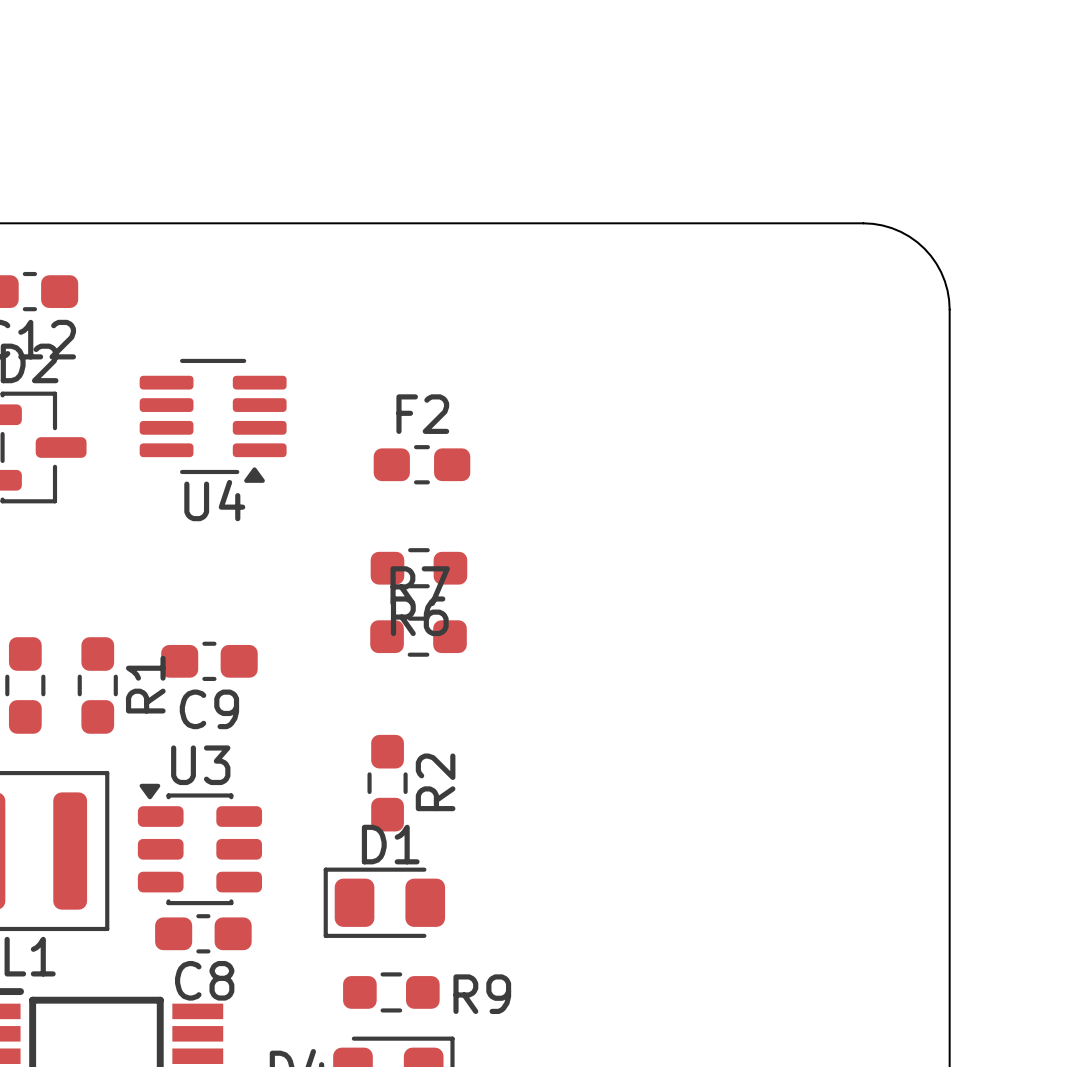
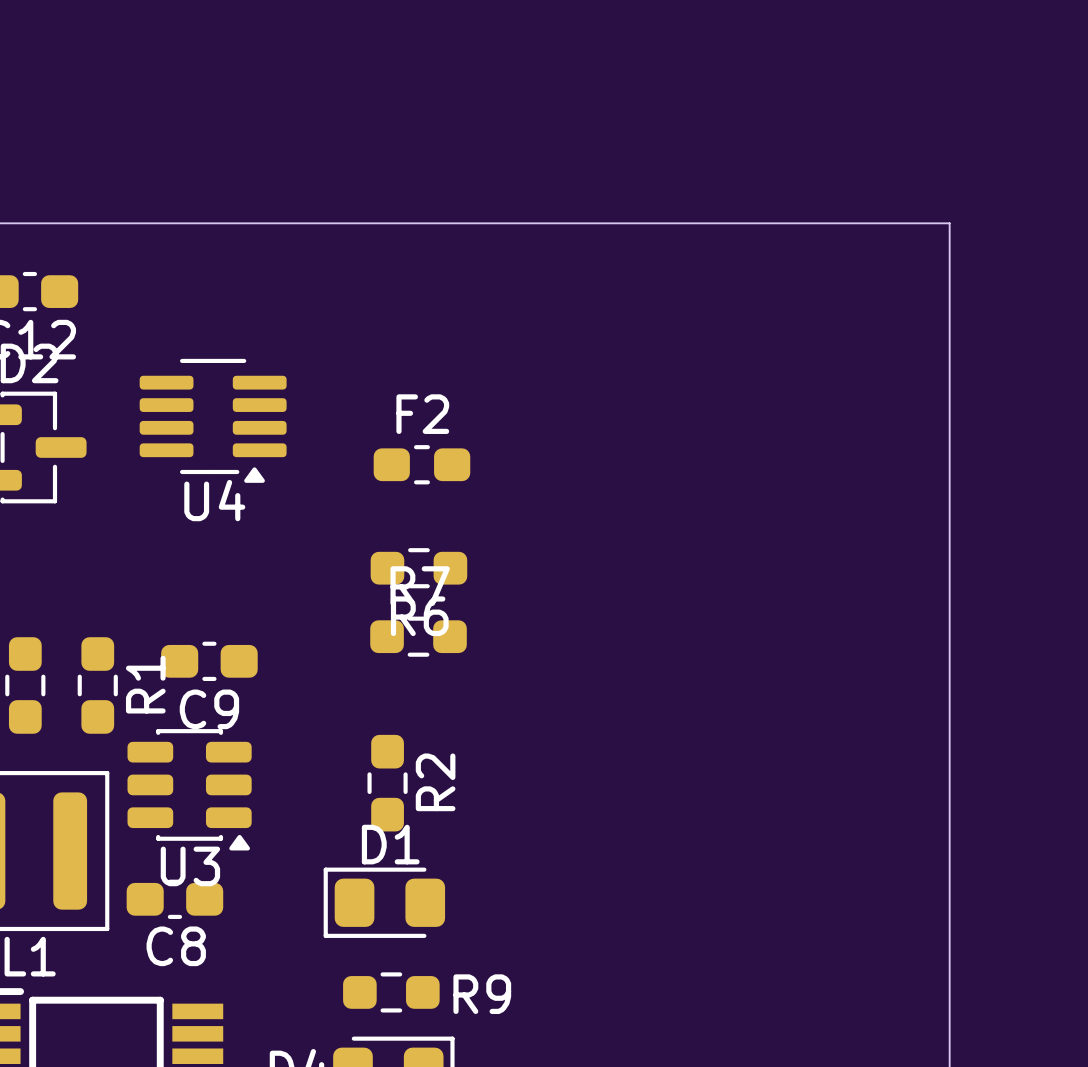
board edge: (863, 223) (882, 225) (900, 231) (924, 248) (936, 263) (944, 281) (949, 309) -> (863, 223) (949, 223) (949, 309)
U3 rotation: 0° (199, 844) -> 180° (189, 789)
C8 position: (203, 933) -> (174, 899)

